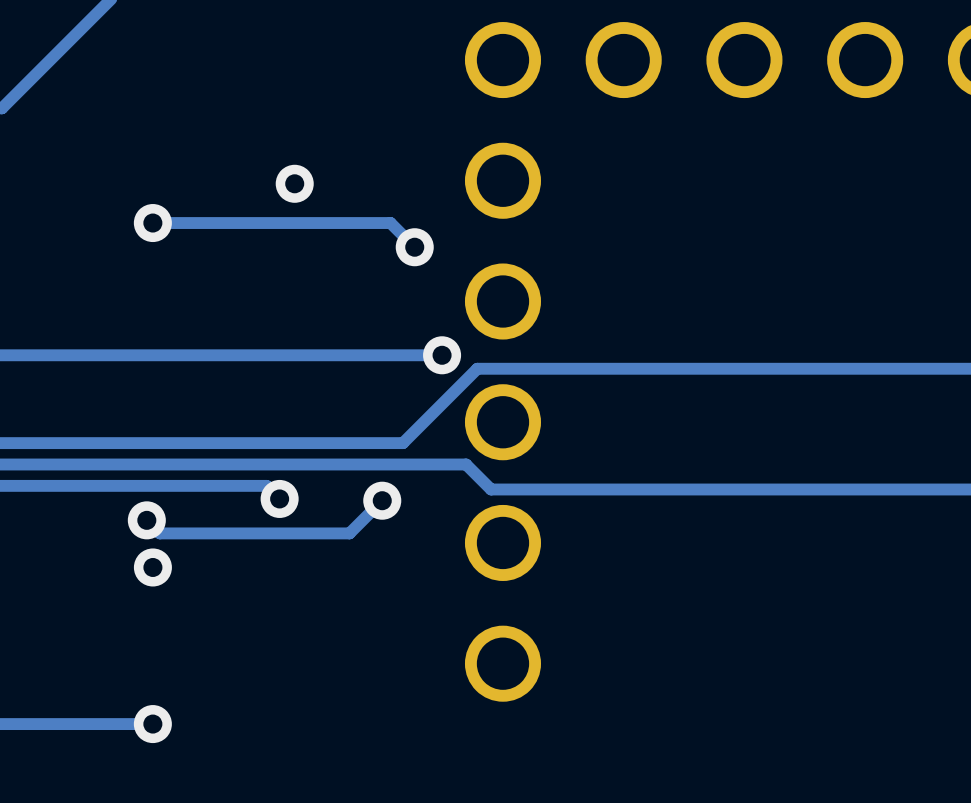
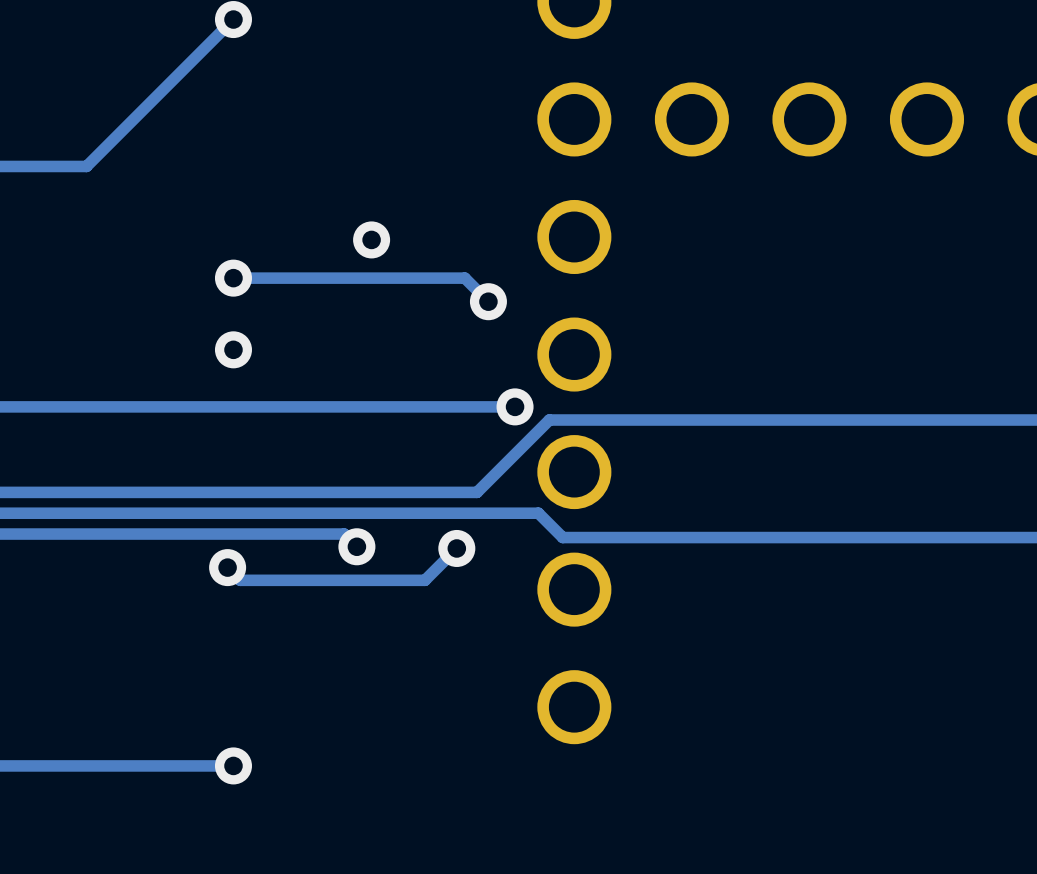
via position: (152, 567) -> (233, 349)

